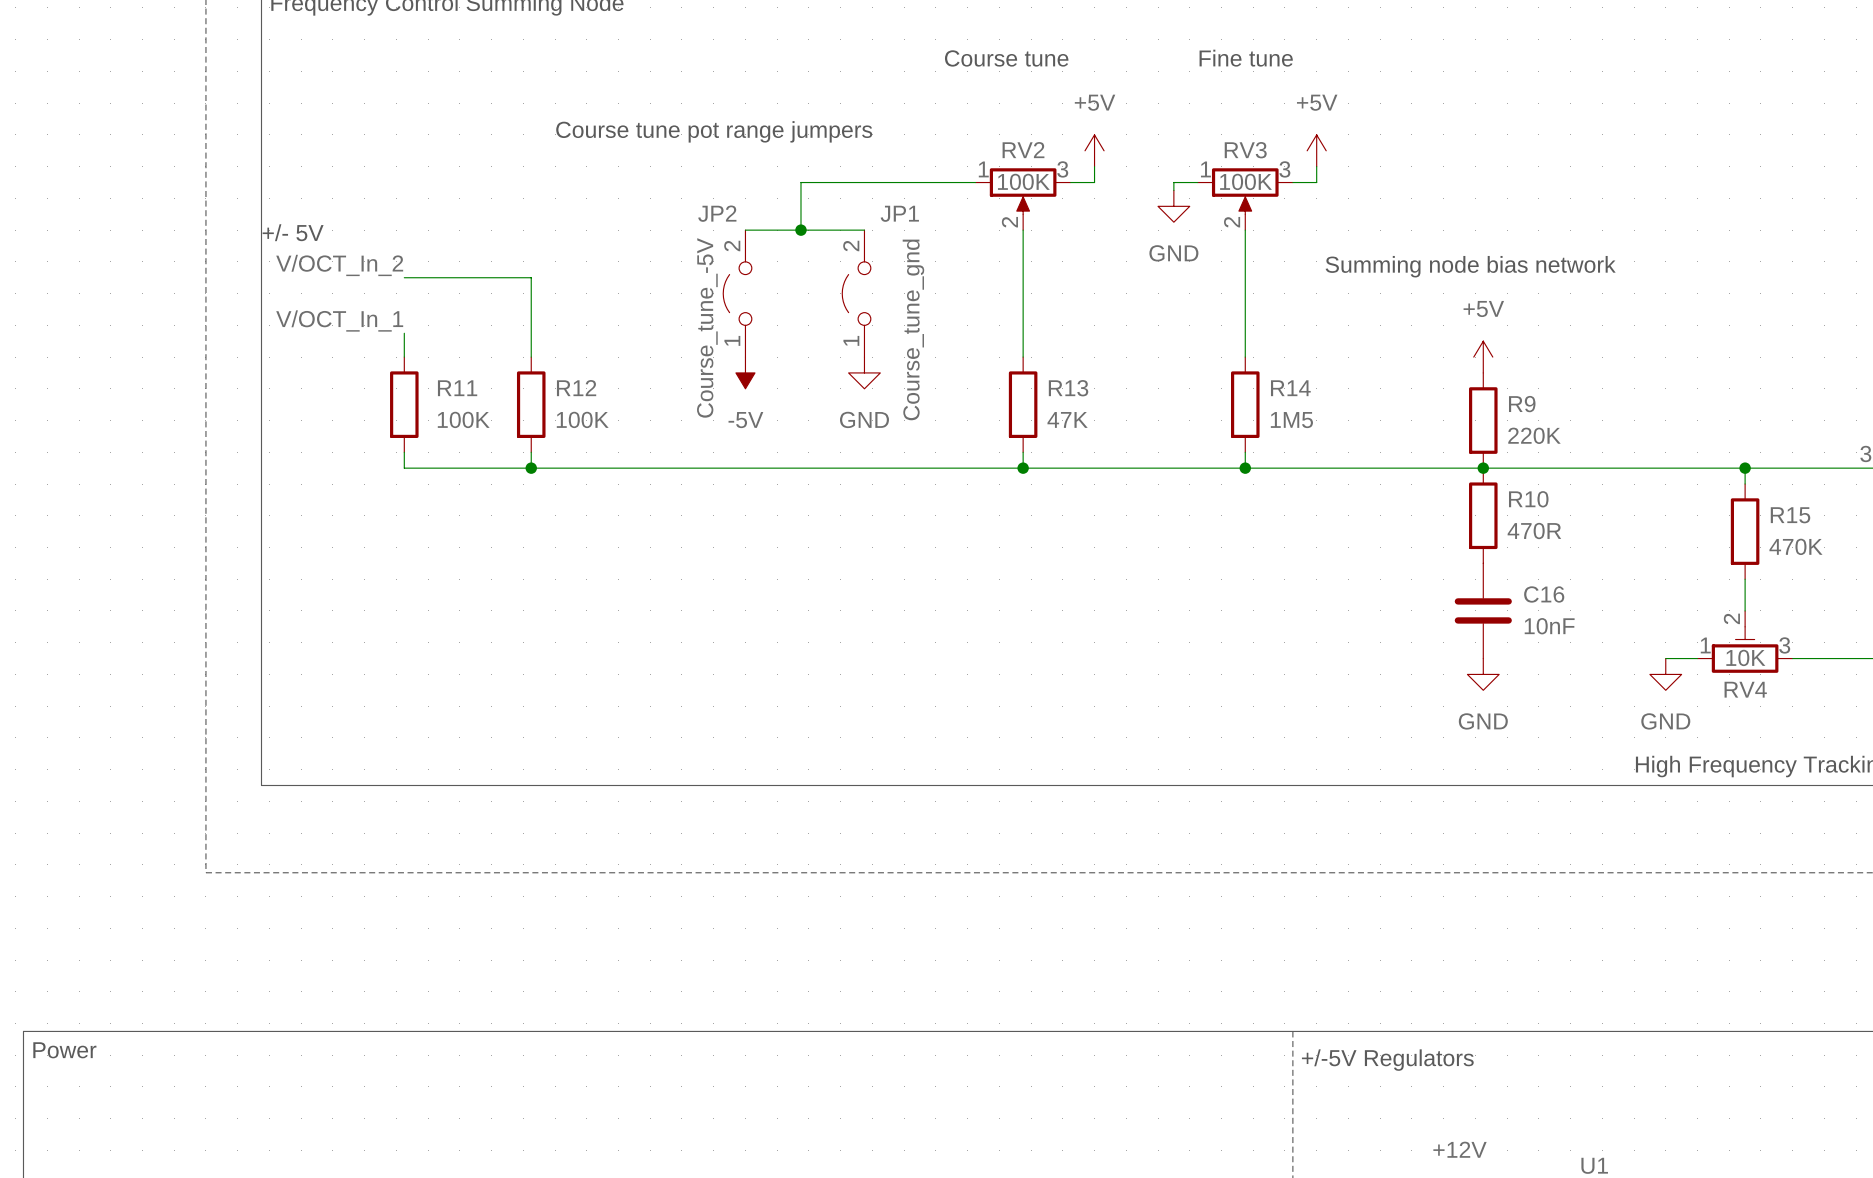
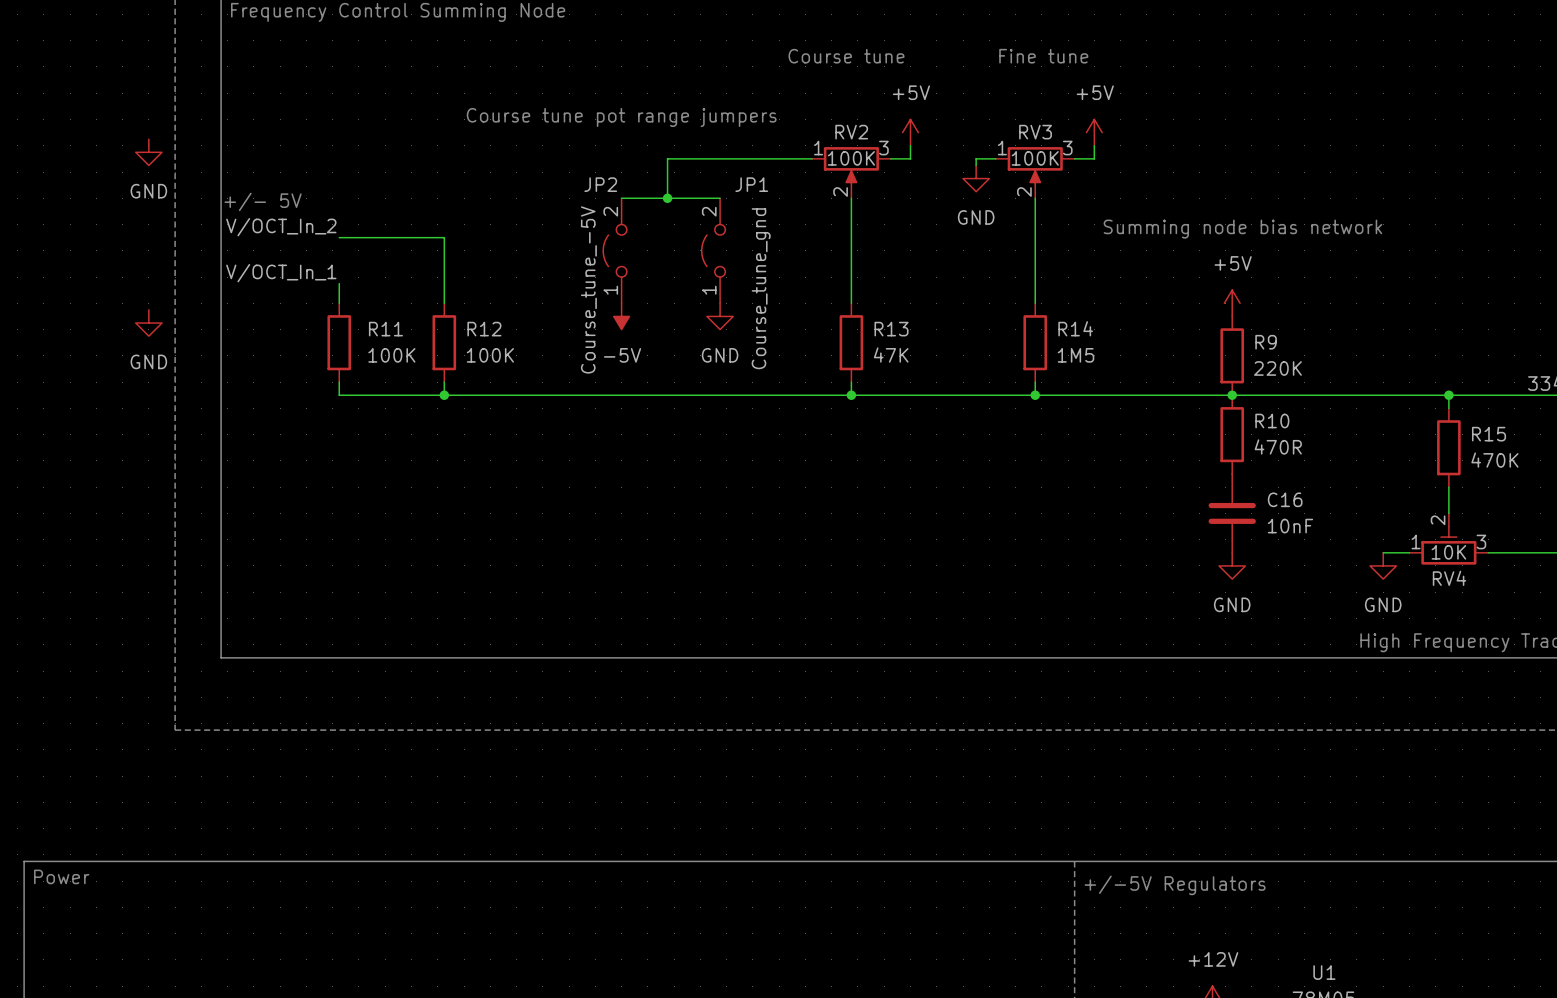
power symbol: none -> GND (148, 152)
power symbol: none -> GND (148, 323)

